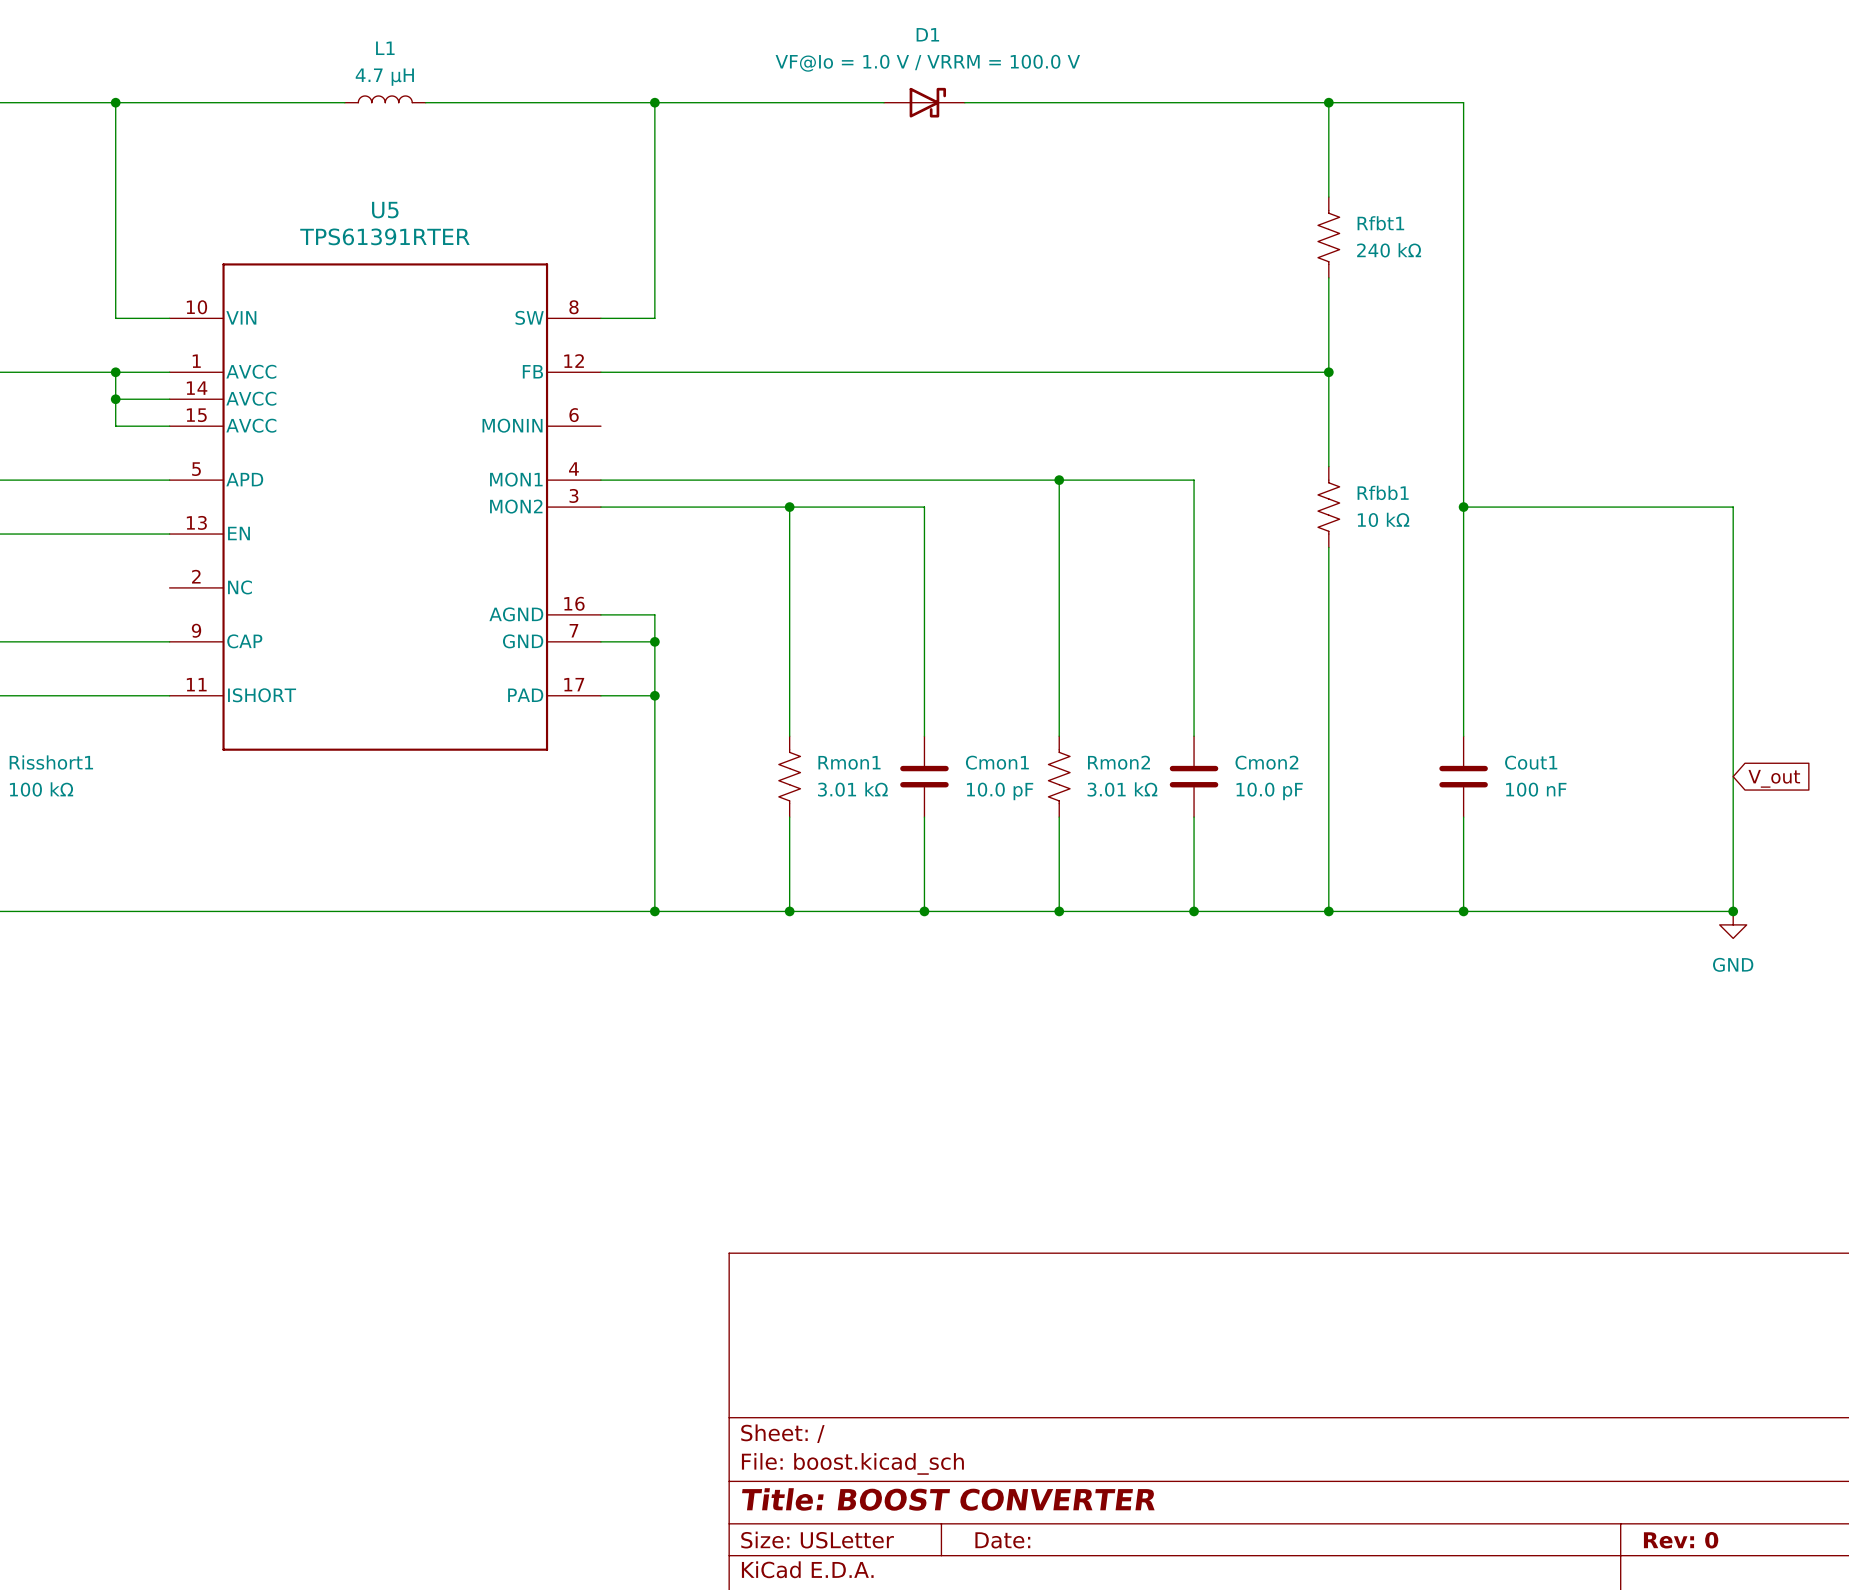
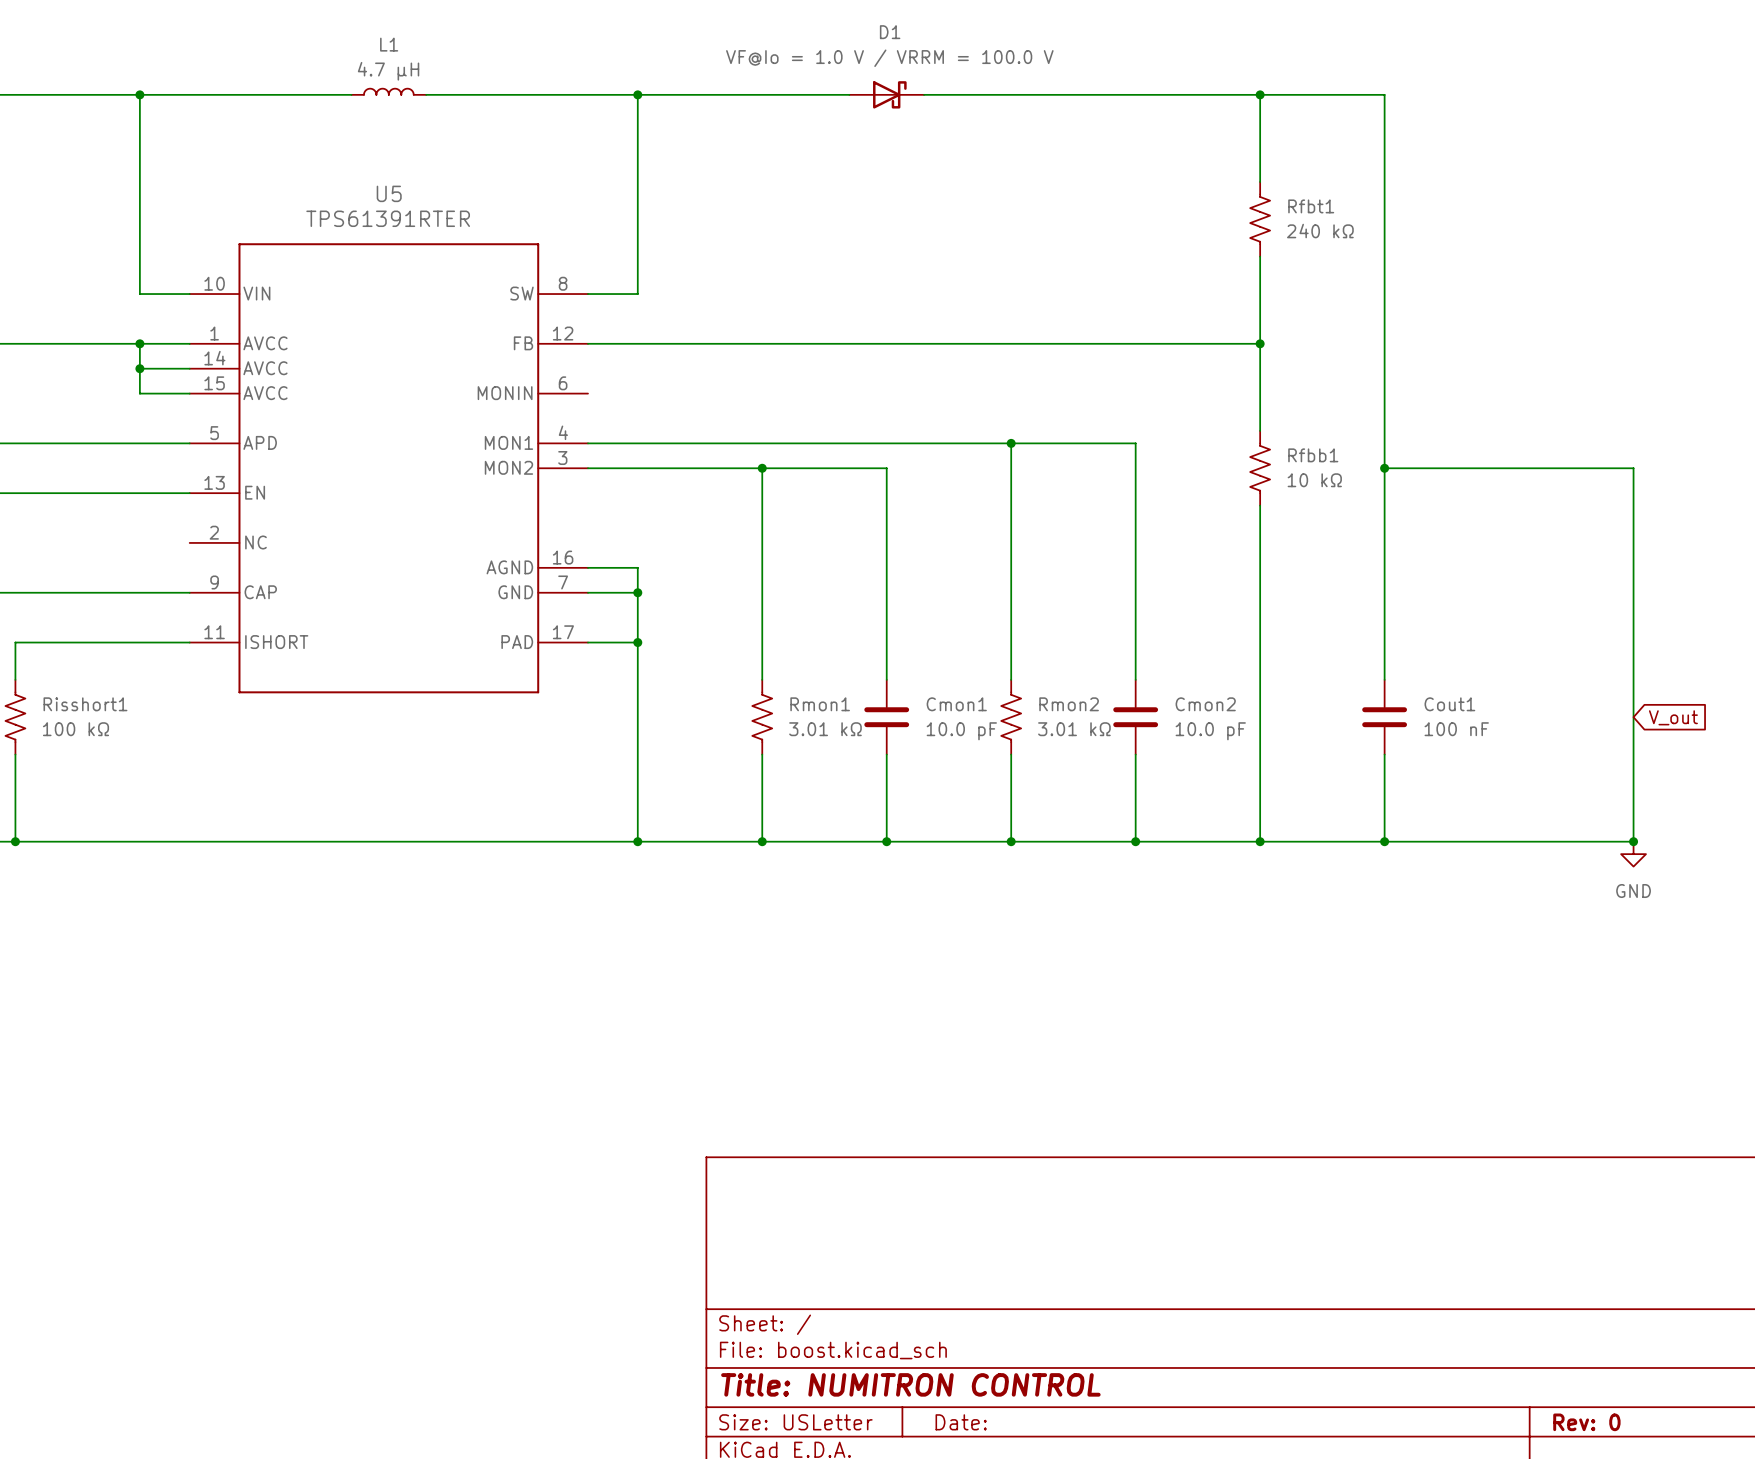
title block: Title: BOOST CONVERTER (948, 1499) -> Title: NUMITRON CONTROL (910, 1384)

